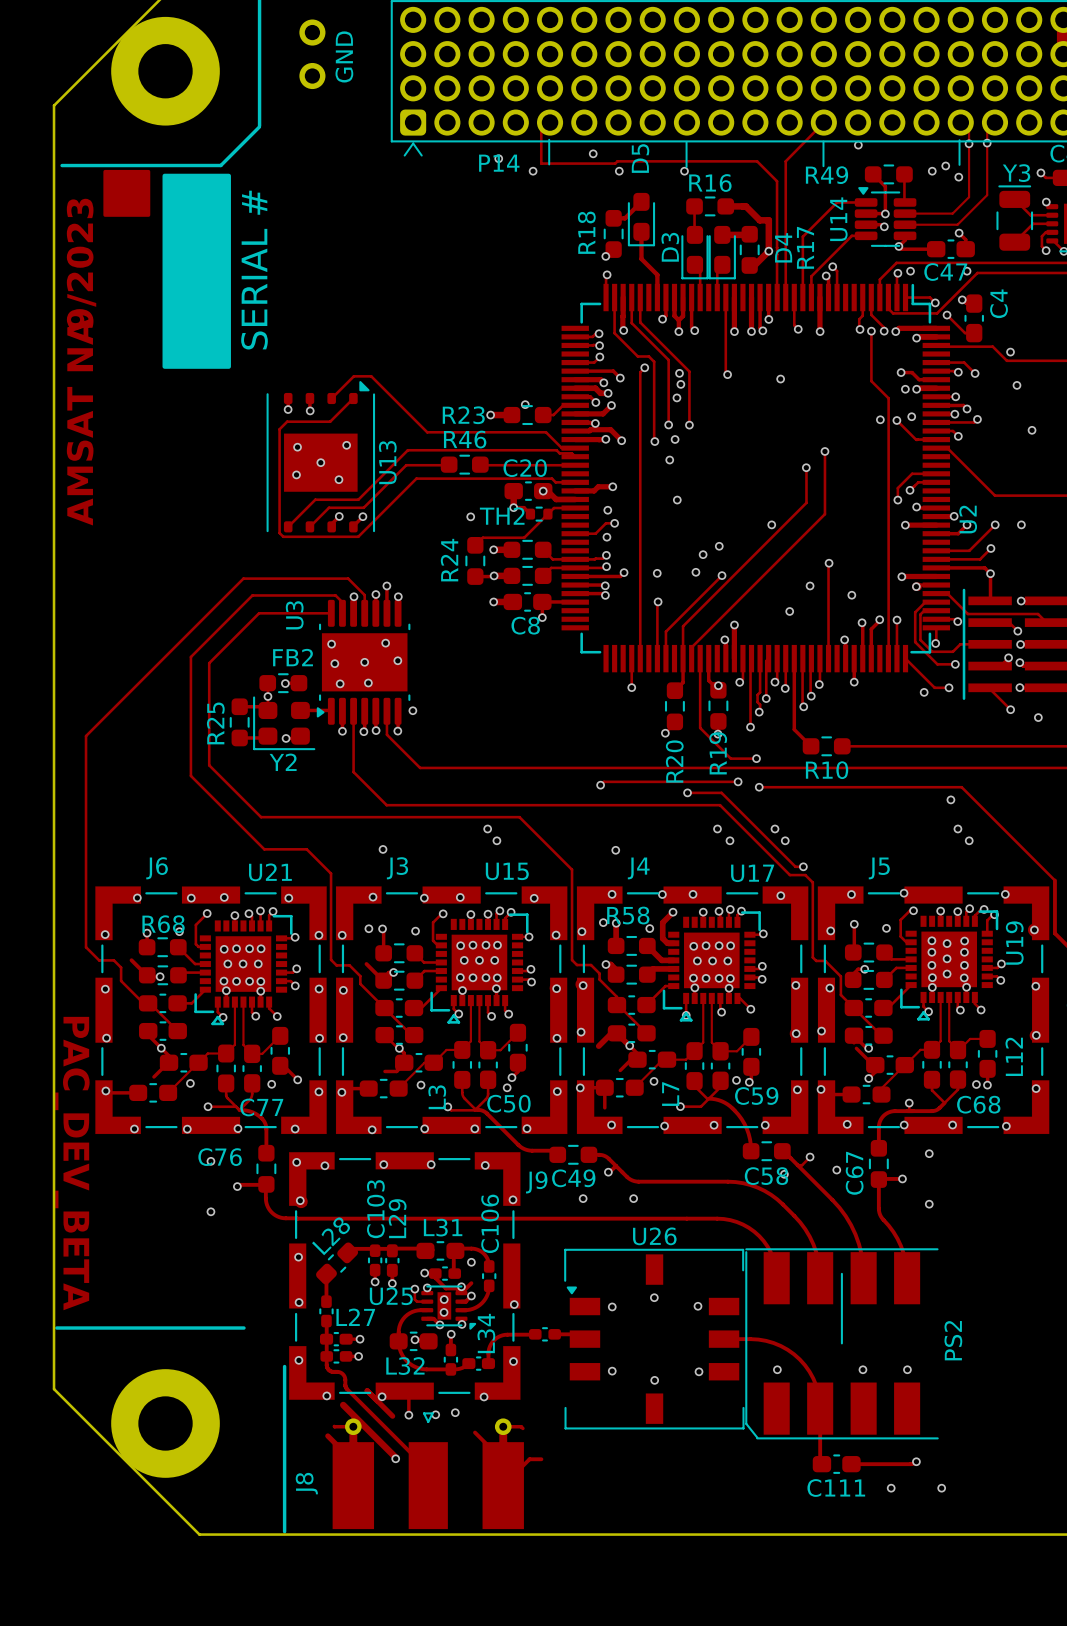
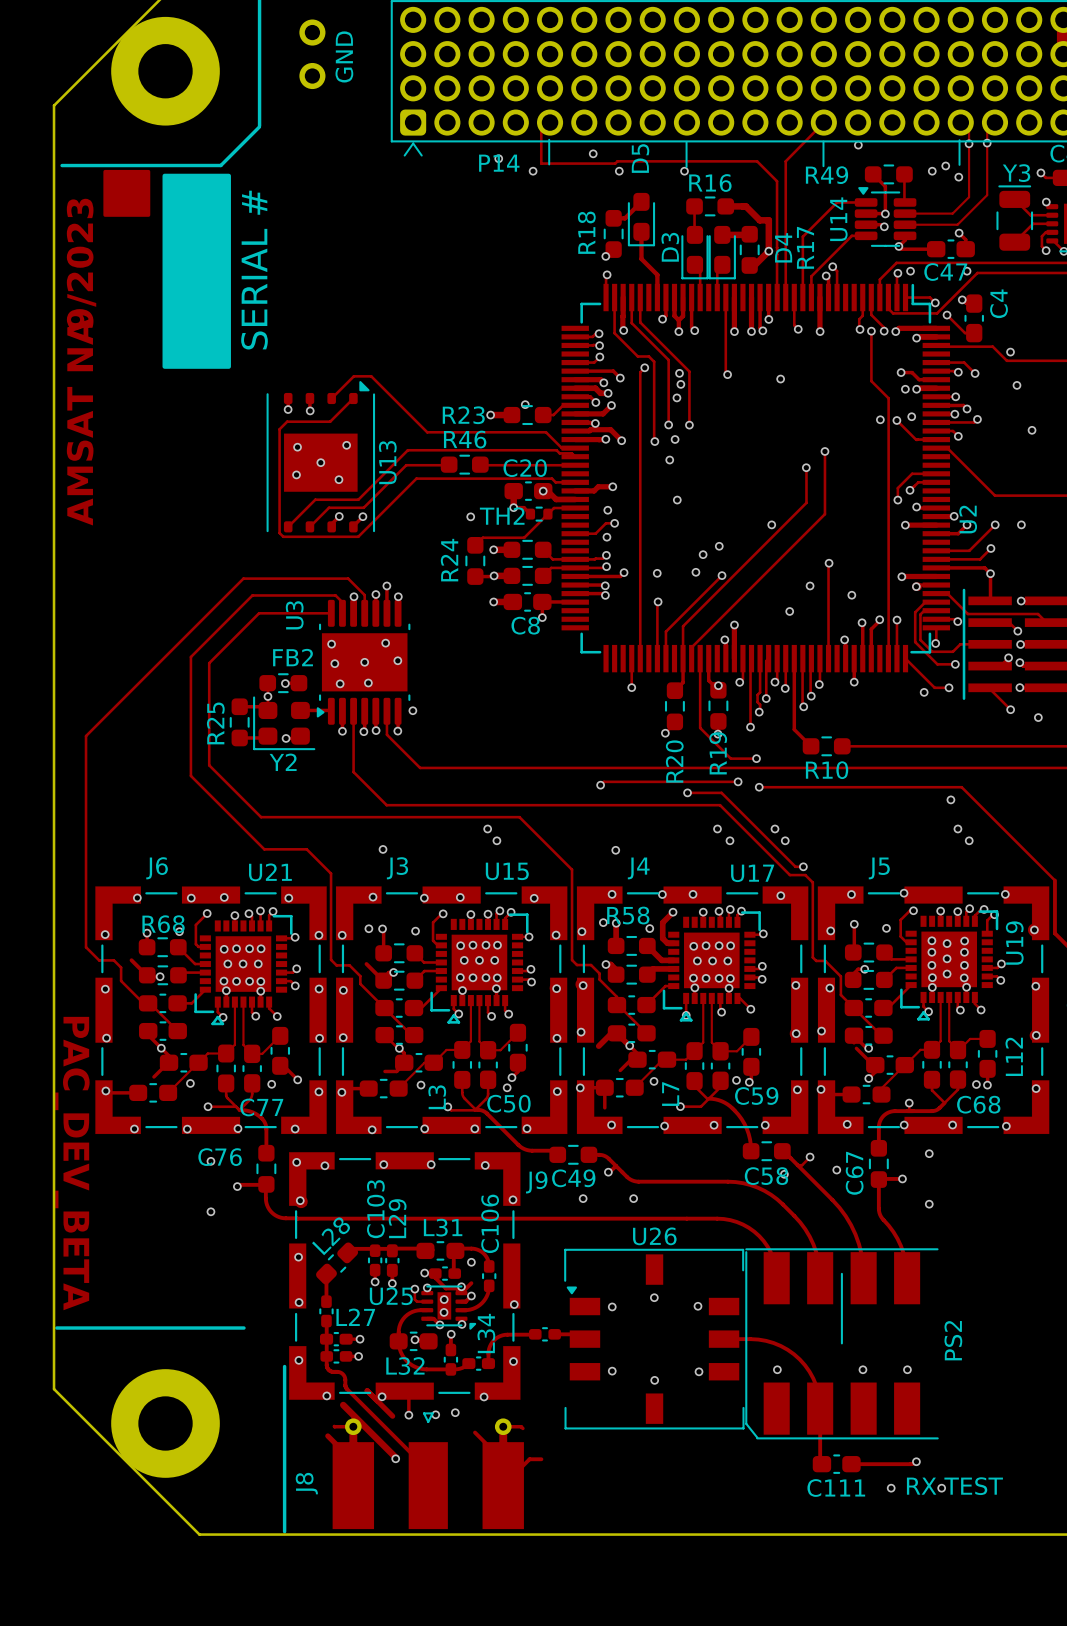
text: none -> RX TEST (954, 1486)

